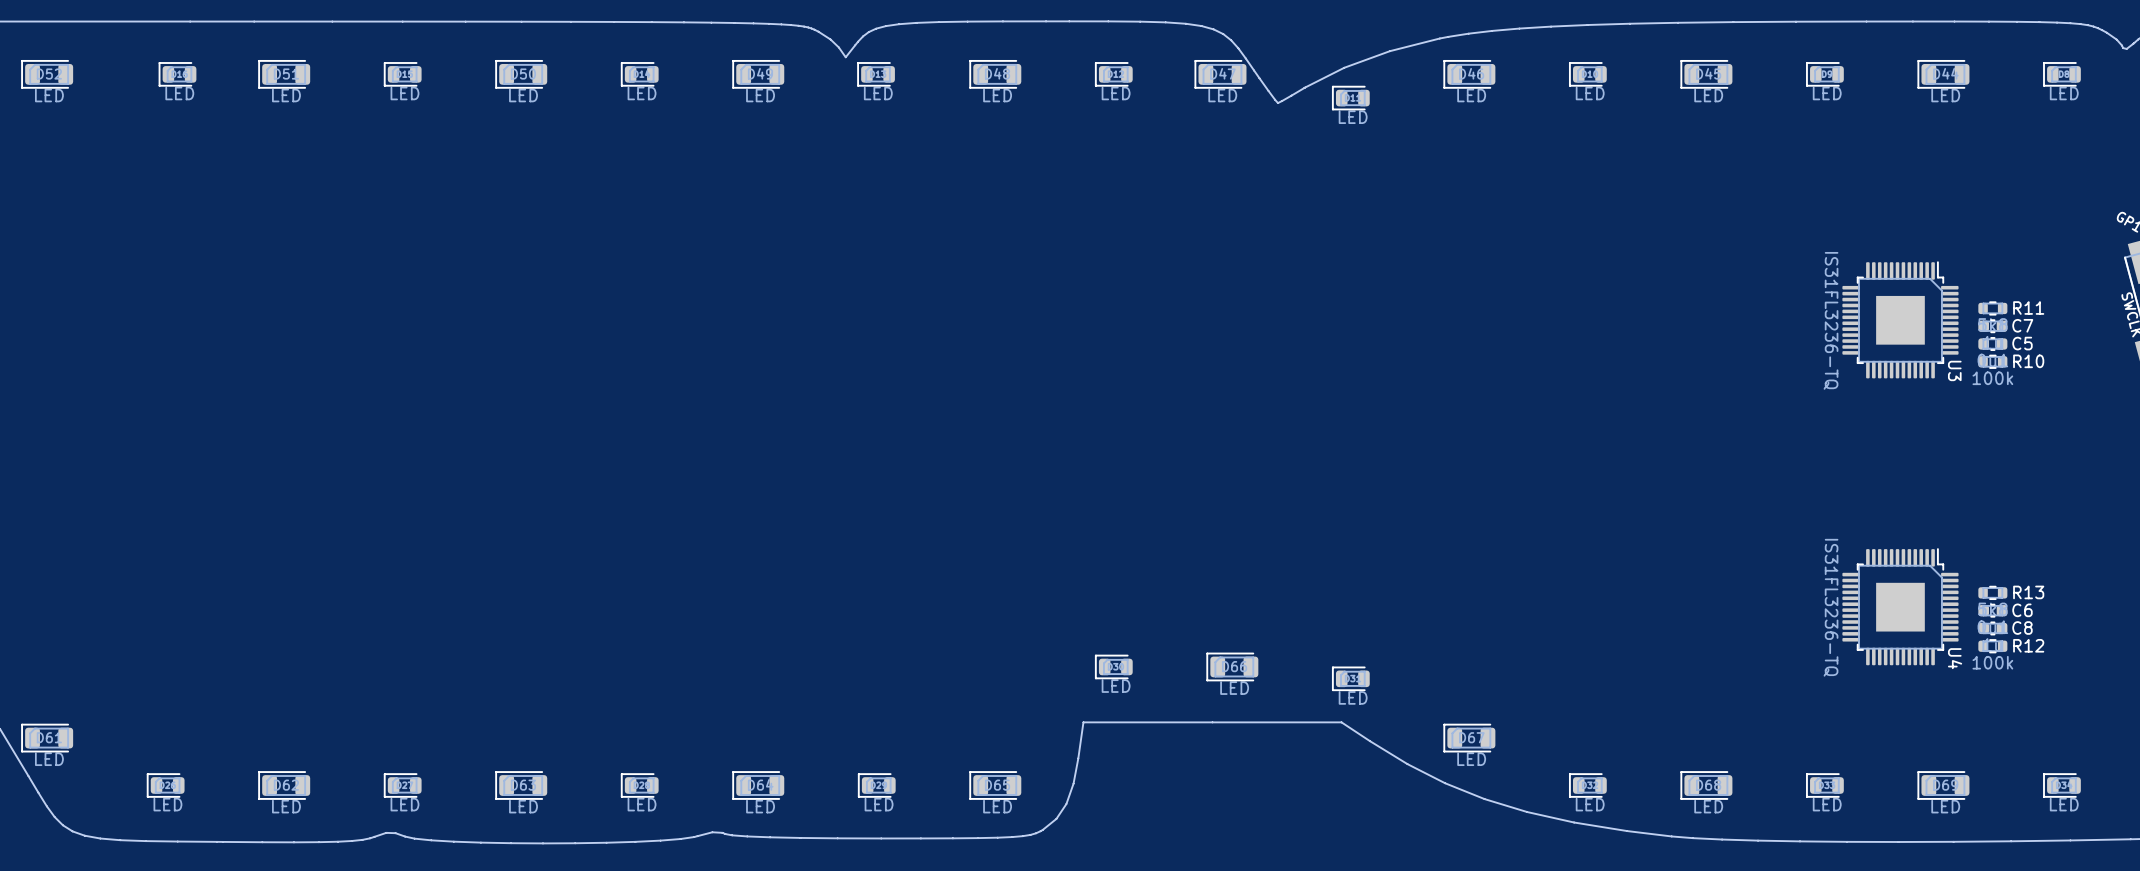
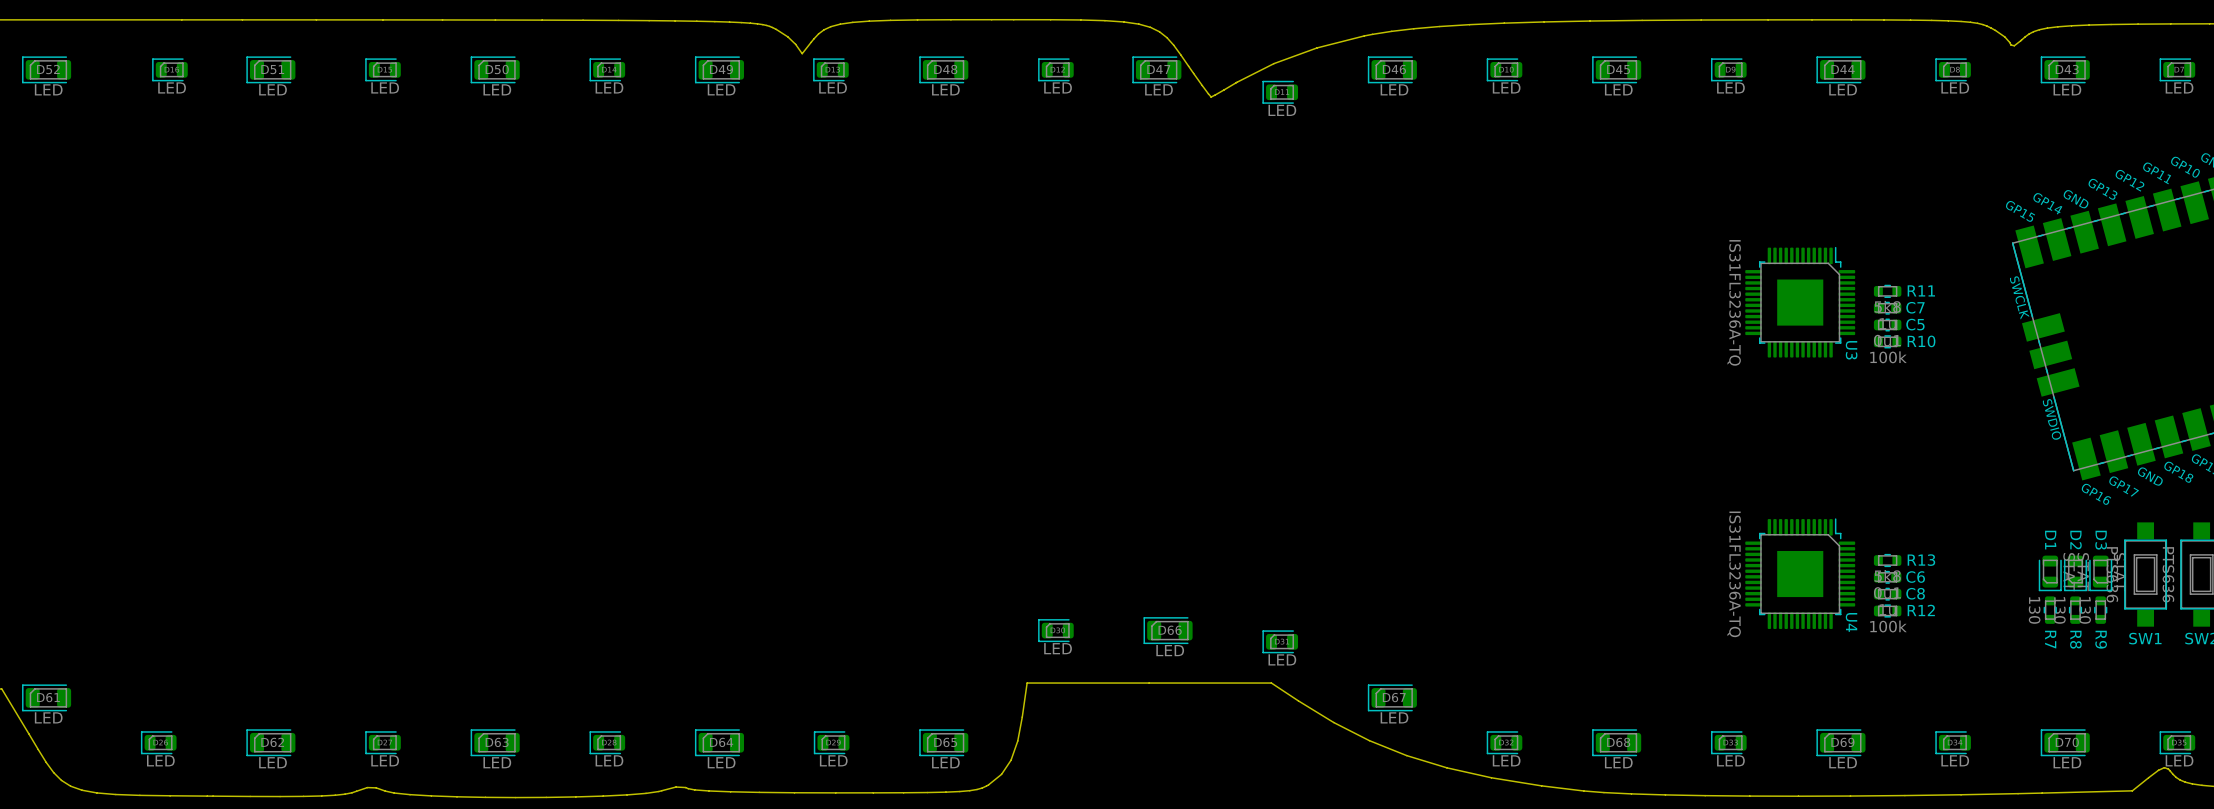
U3 value: IS31FL3236-TQ (1831, 320) -> IS31FL3236A-TQ (1734, 302)
U4 value: IS31FL3236-TQ (1831, 607) -> IS31FL3236A-TQ (1734, 574)

